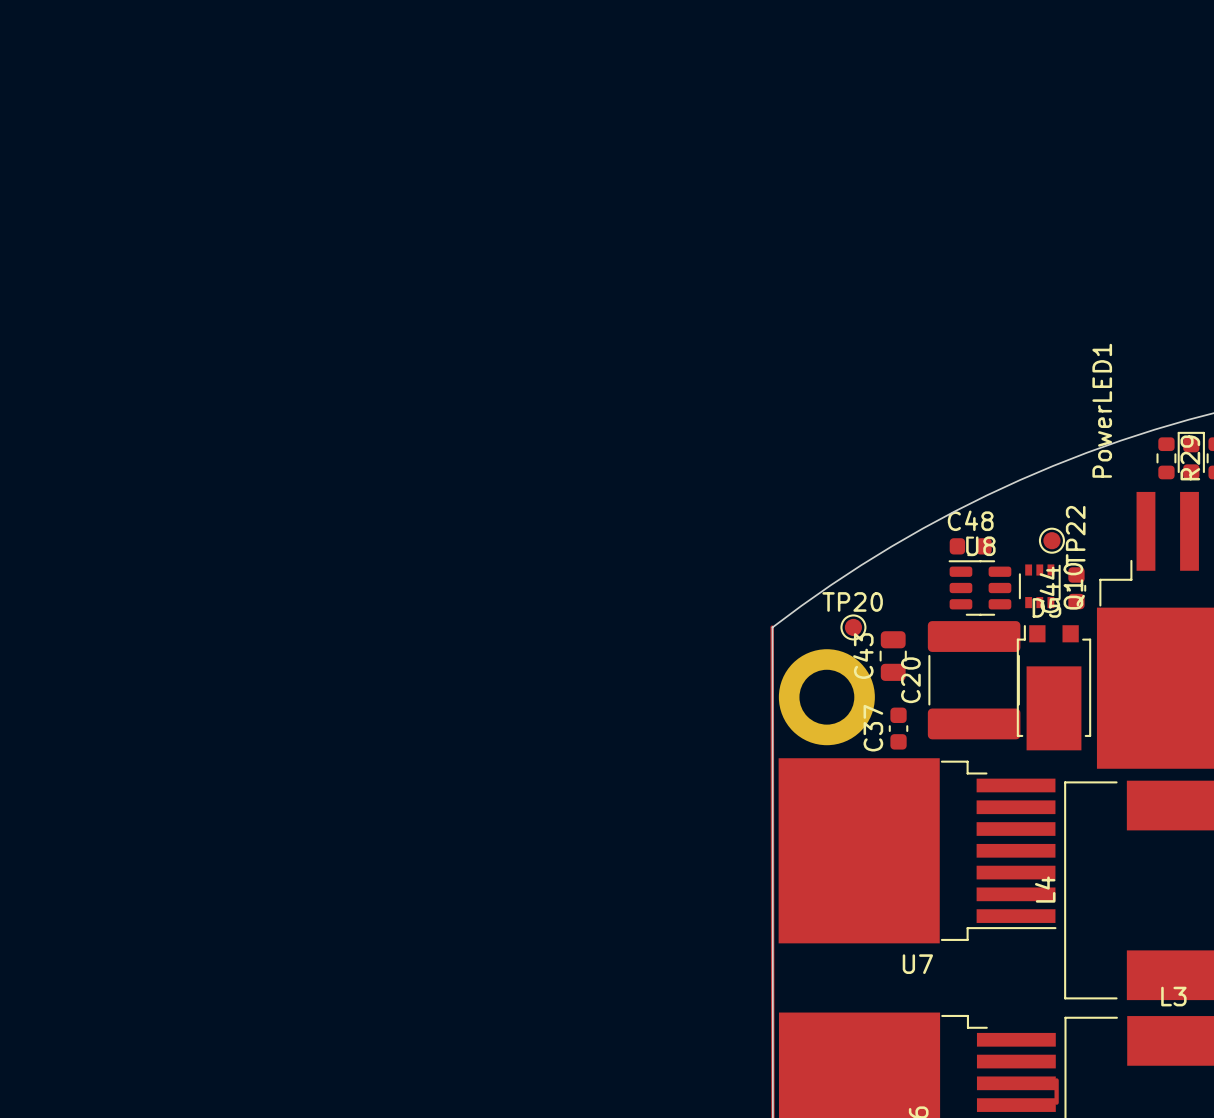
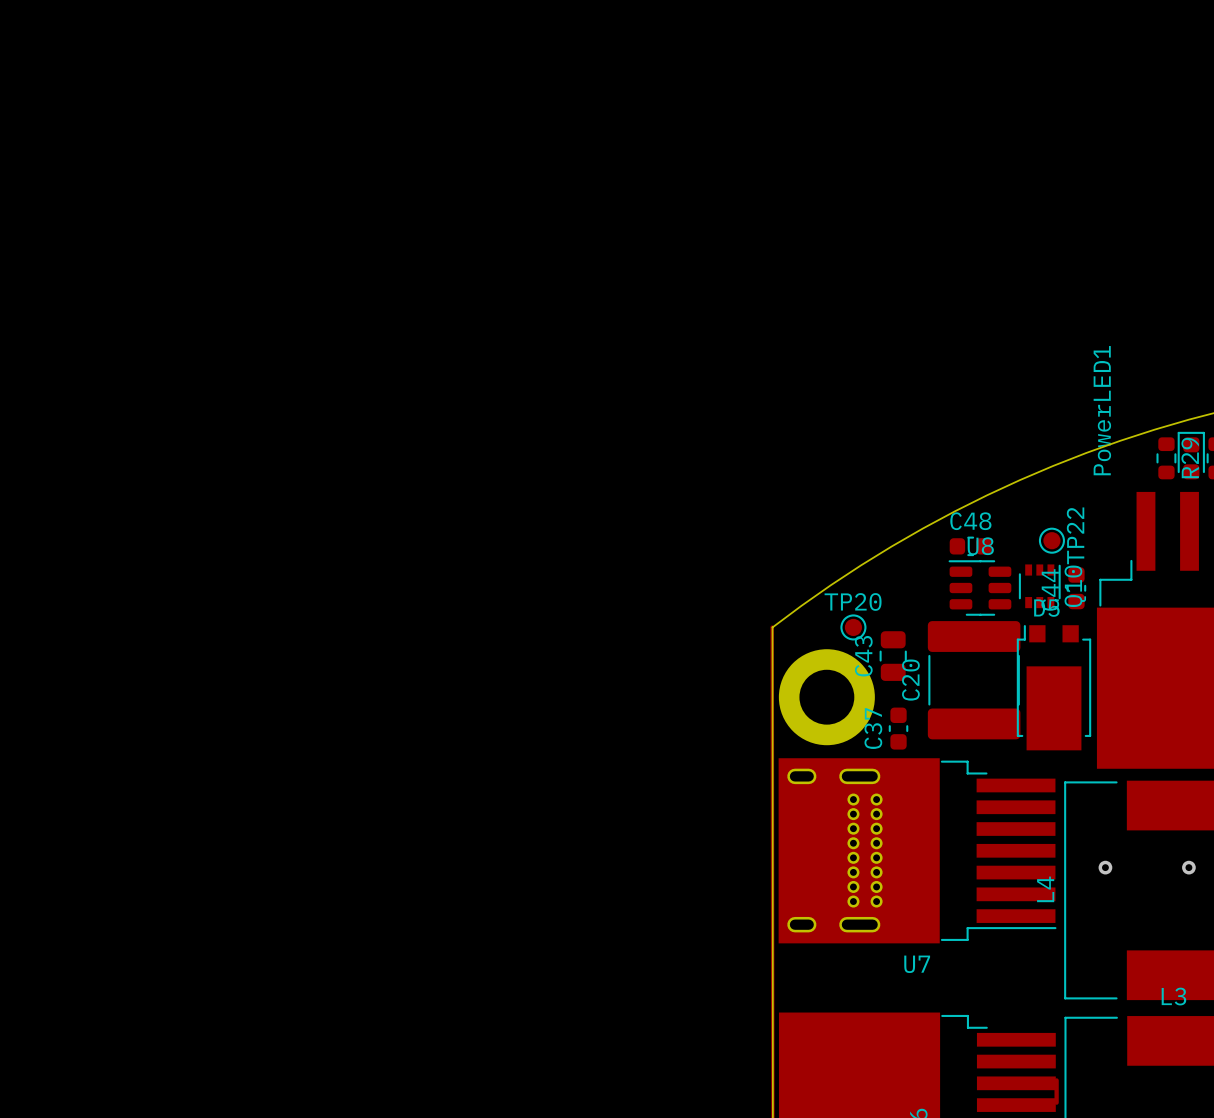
part: none -> (834, 850)
via: none -> (1105, 867)
via: none -> (1188, 867)

